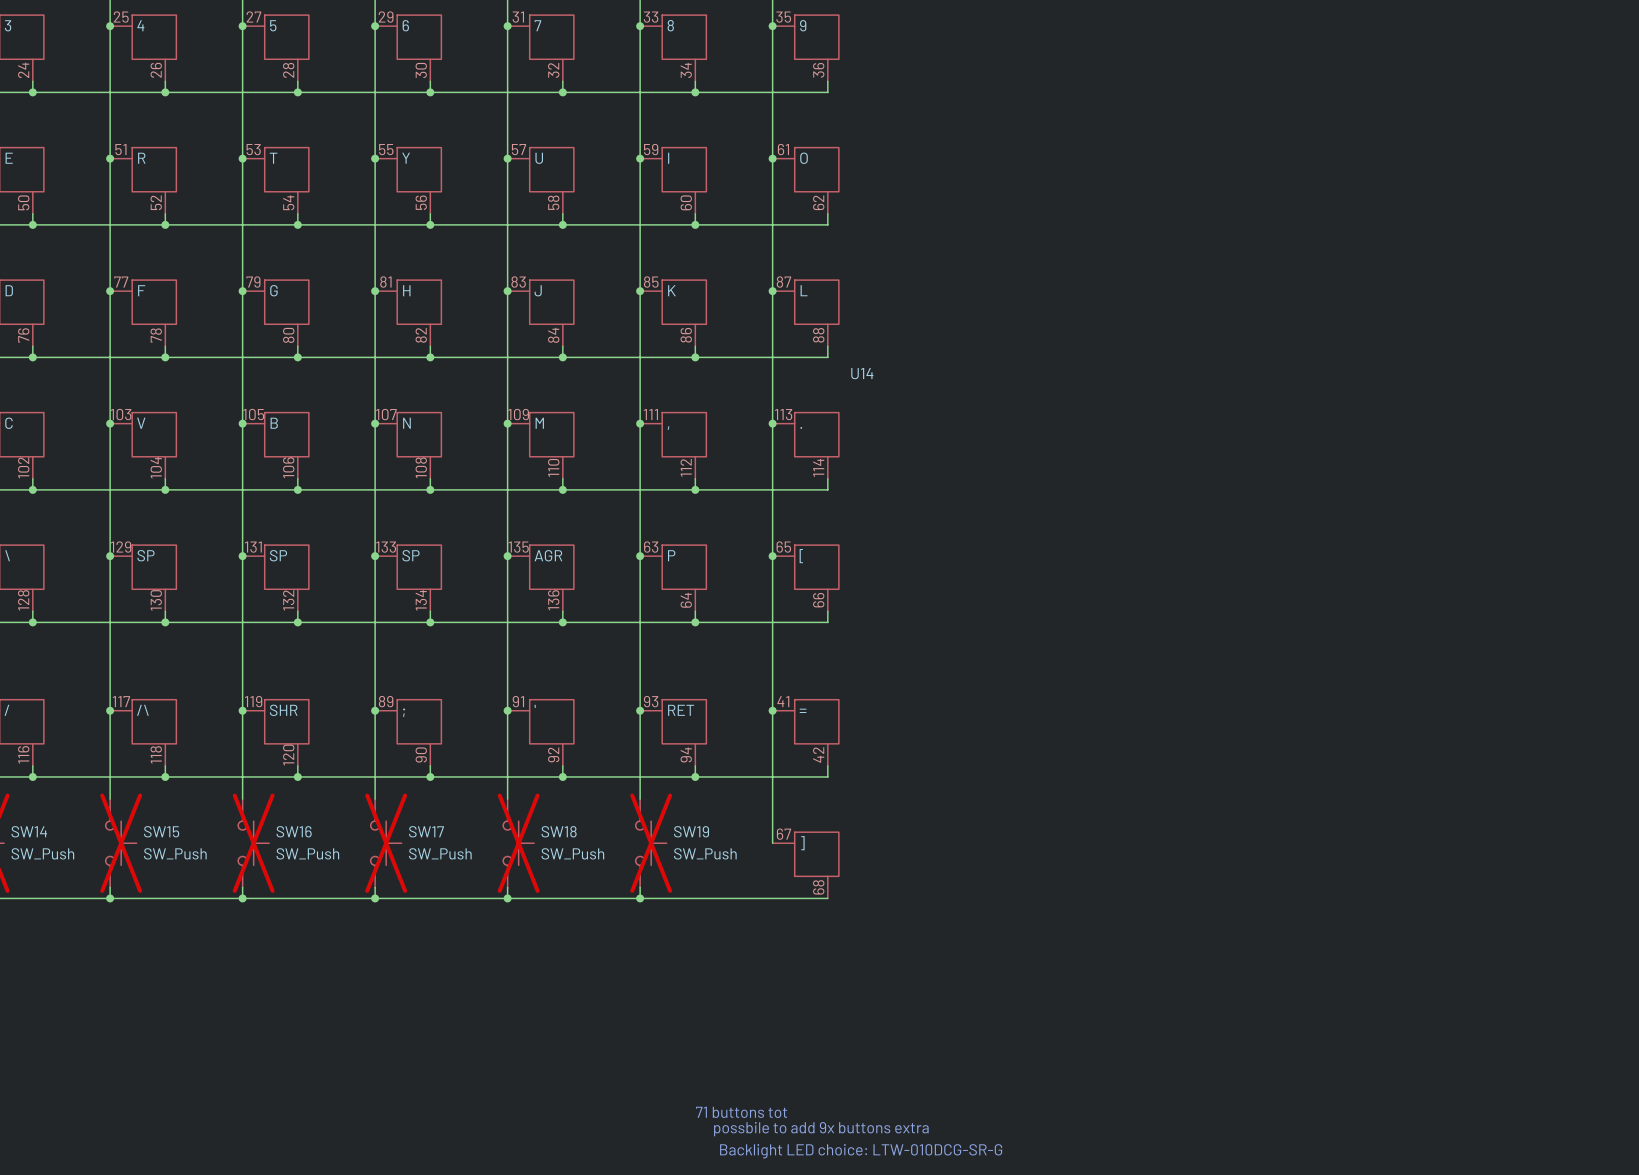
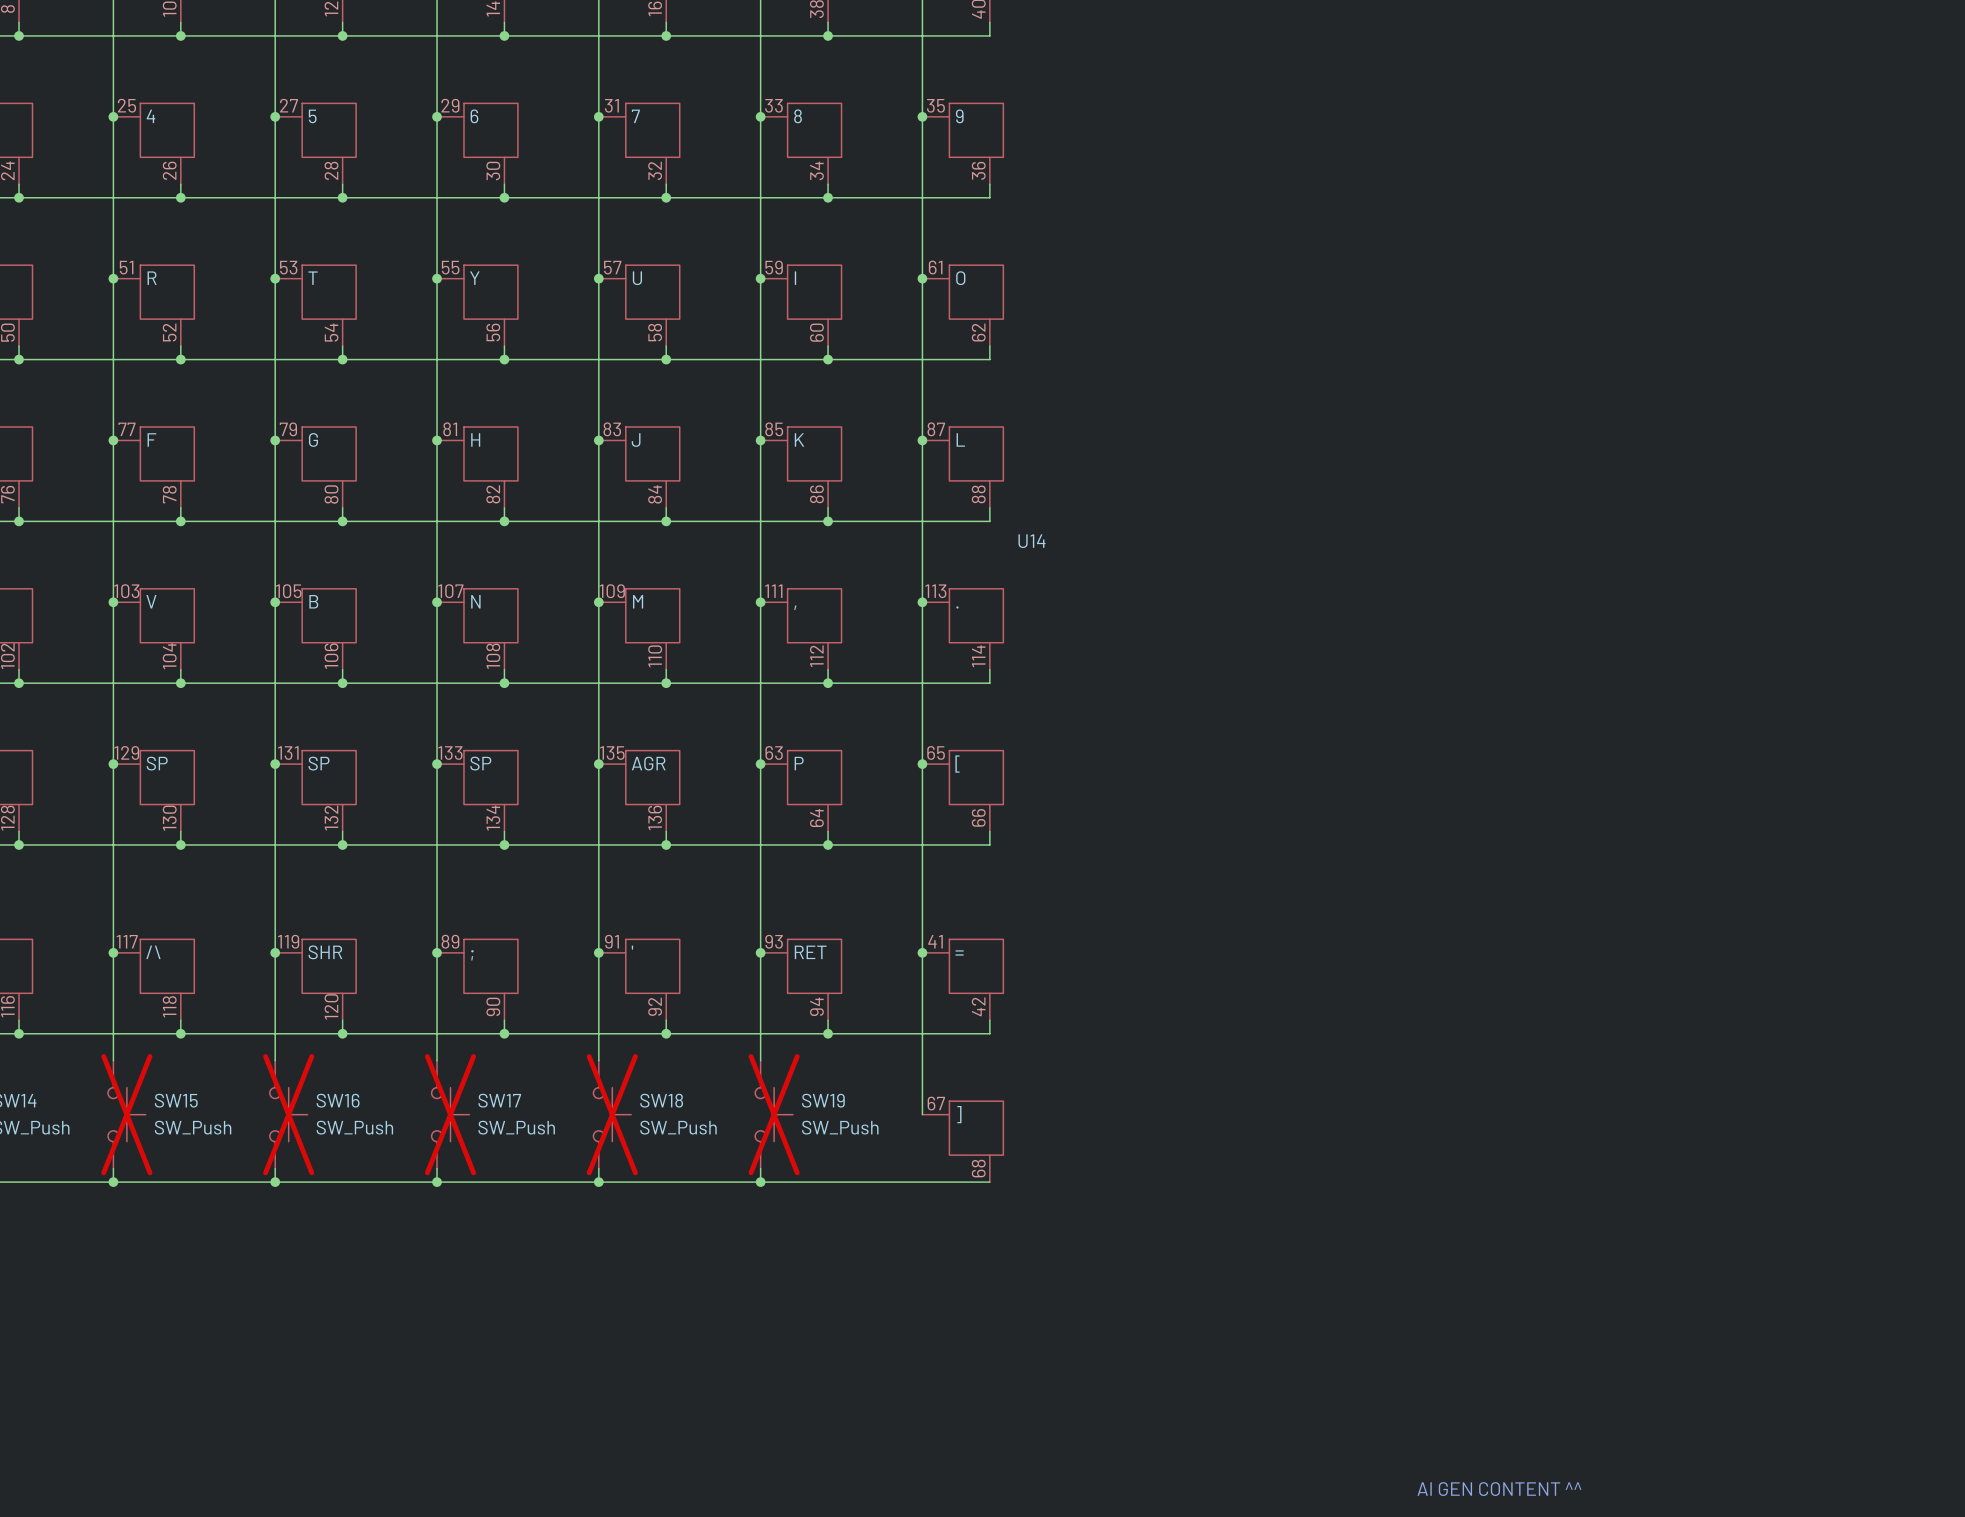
text: 71 buttons tot (741, 1112) -> none
text: possbile to add 9x buttons extra (821, 1129) -> none
text: none -> AI GEN CONTENT ^^ (1499, 1489)
text: Backlight LED choice: LTW-010DCG-SR-G (861, 1151) -> none

